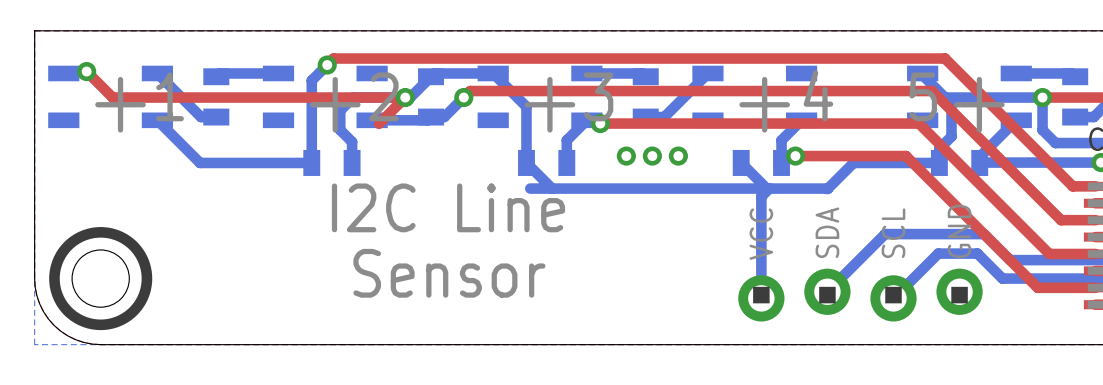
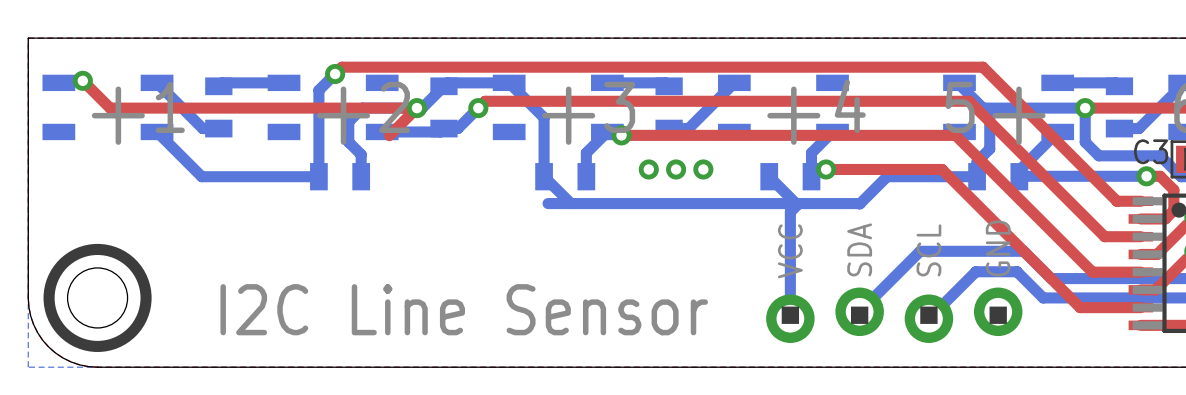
text: I2C Line (448, 207) -> none
text: Sensor (449, 273) -> I2C Line Sensor (464, 309)

